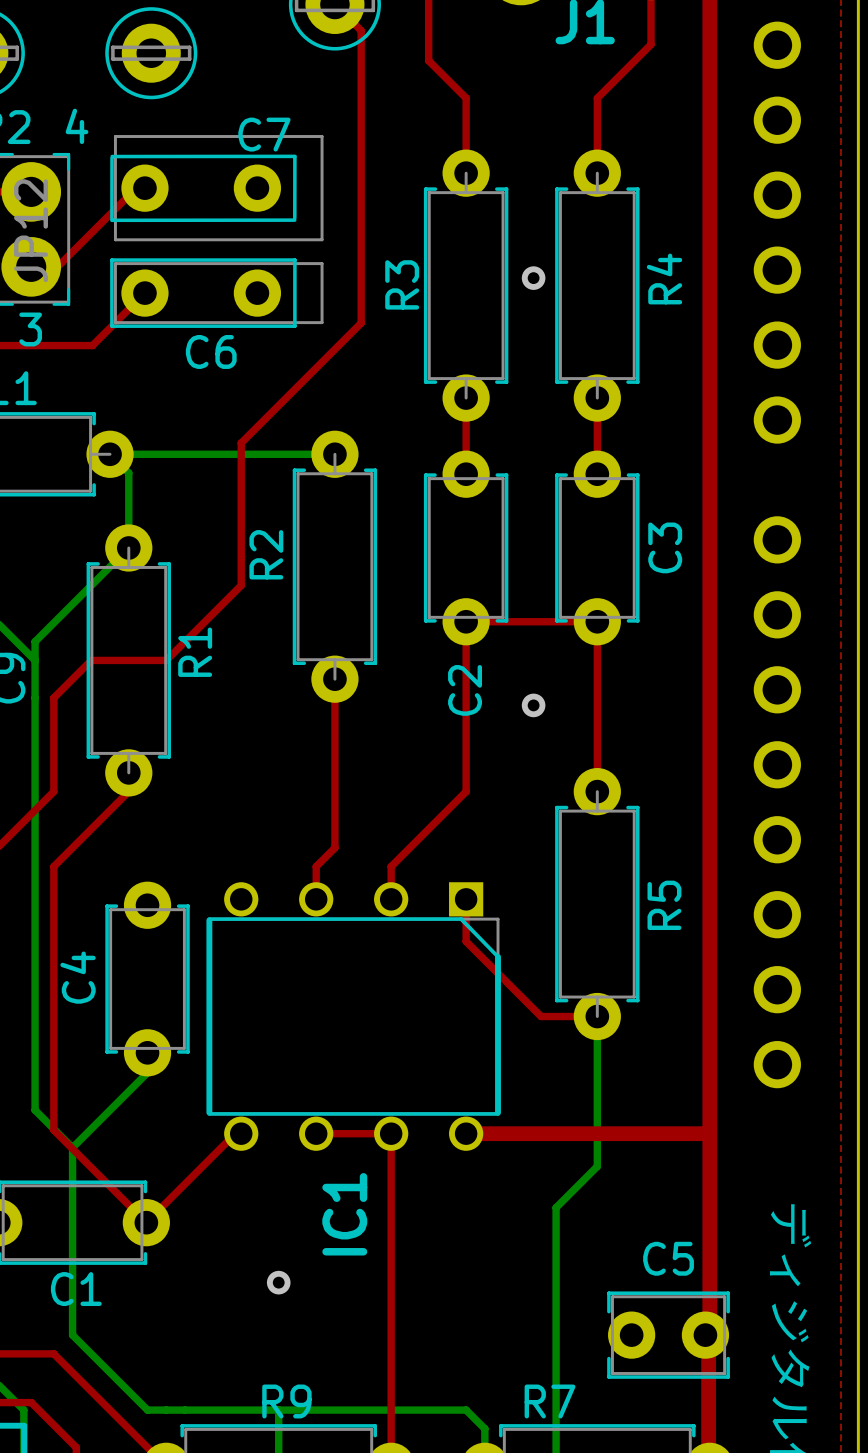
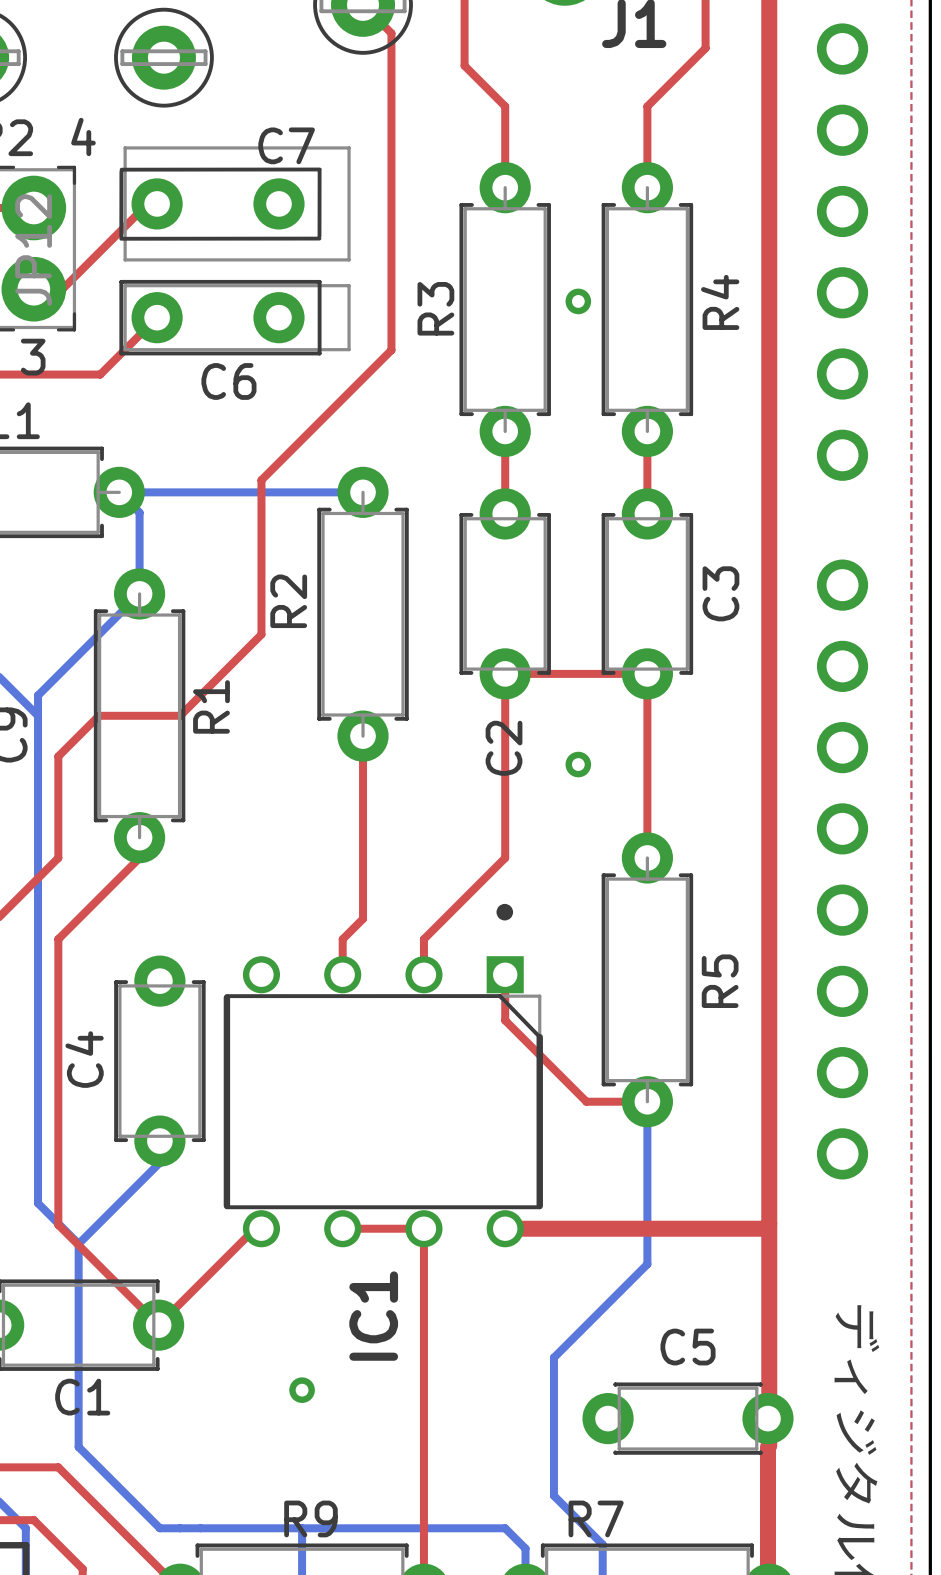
IC1 footprint: [206, 882, 501, 1151] -> [223, 903, 543, 1248]
bottom track: (556, 1207) (556, 1425) -> (602, 1308) (553, 1357) (553, 1495) (602, 1544)
C5 footprint: [607, 1291, 730, 1379] -> [582, 1382, 794, 1455]

